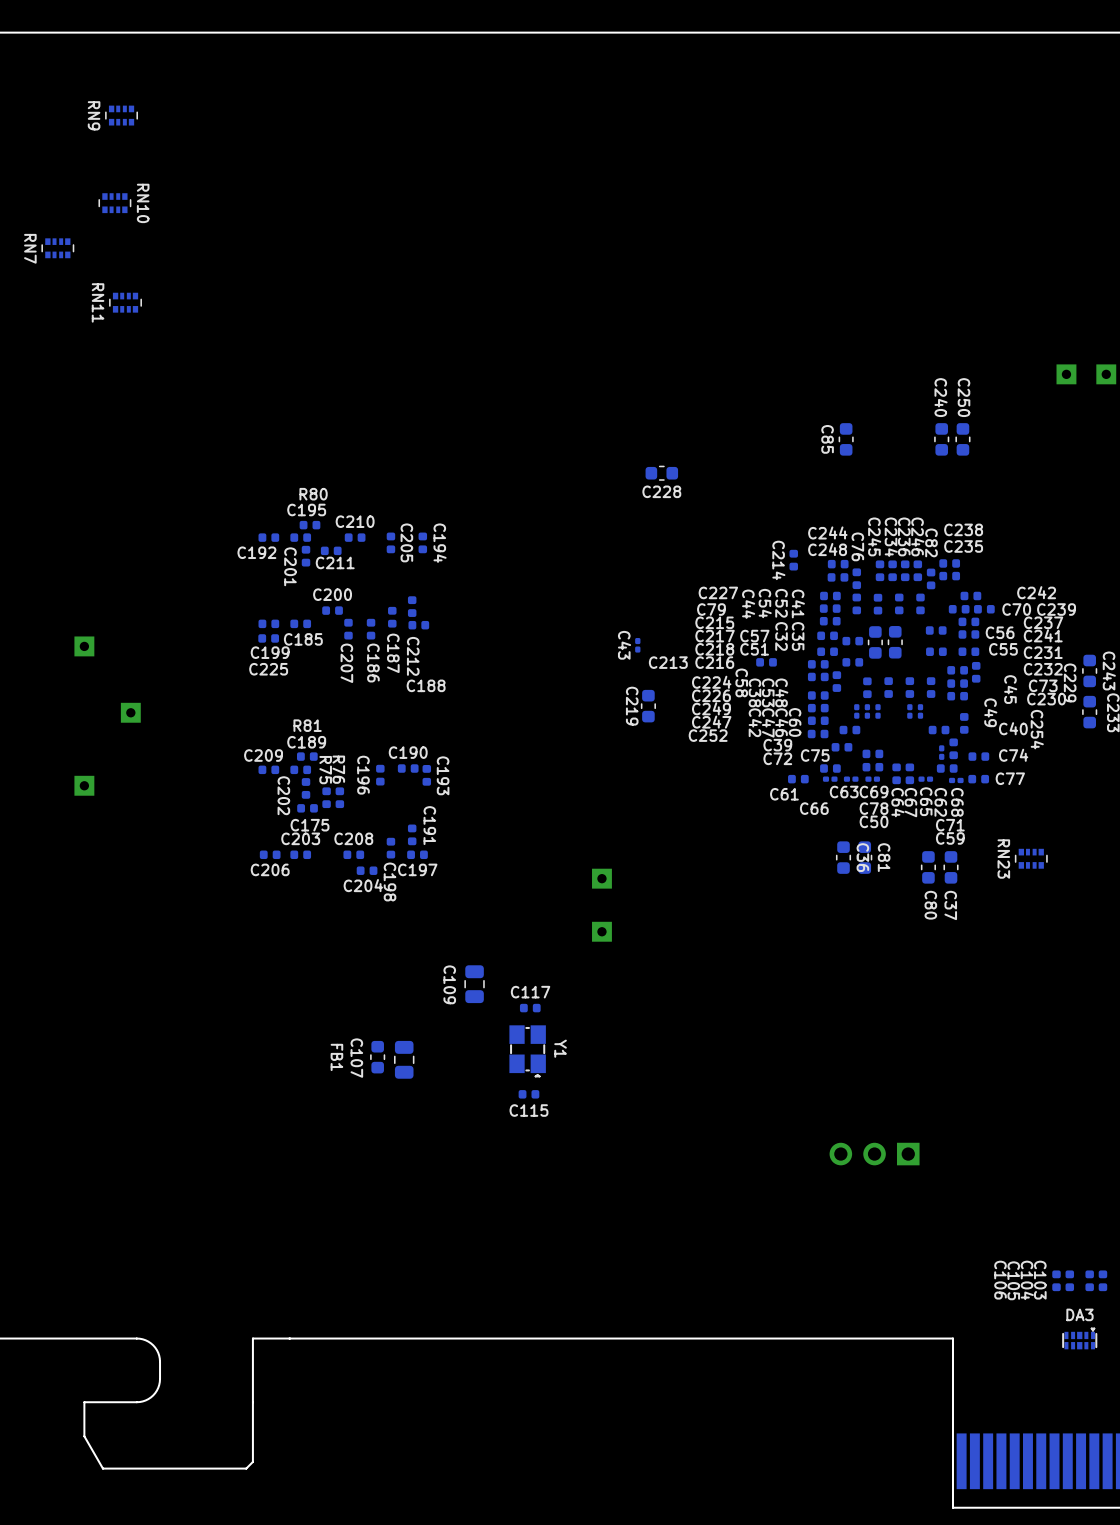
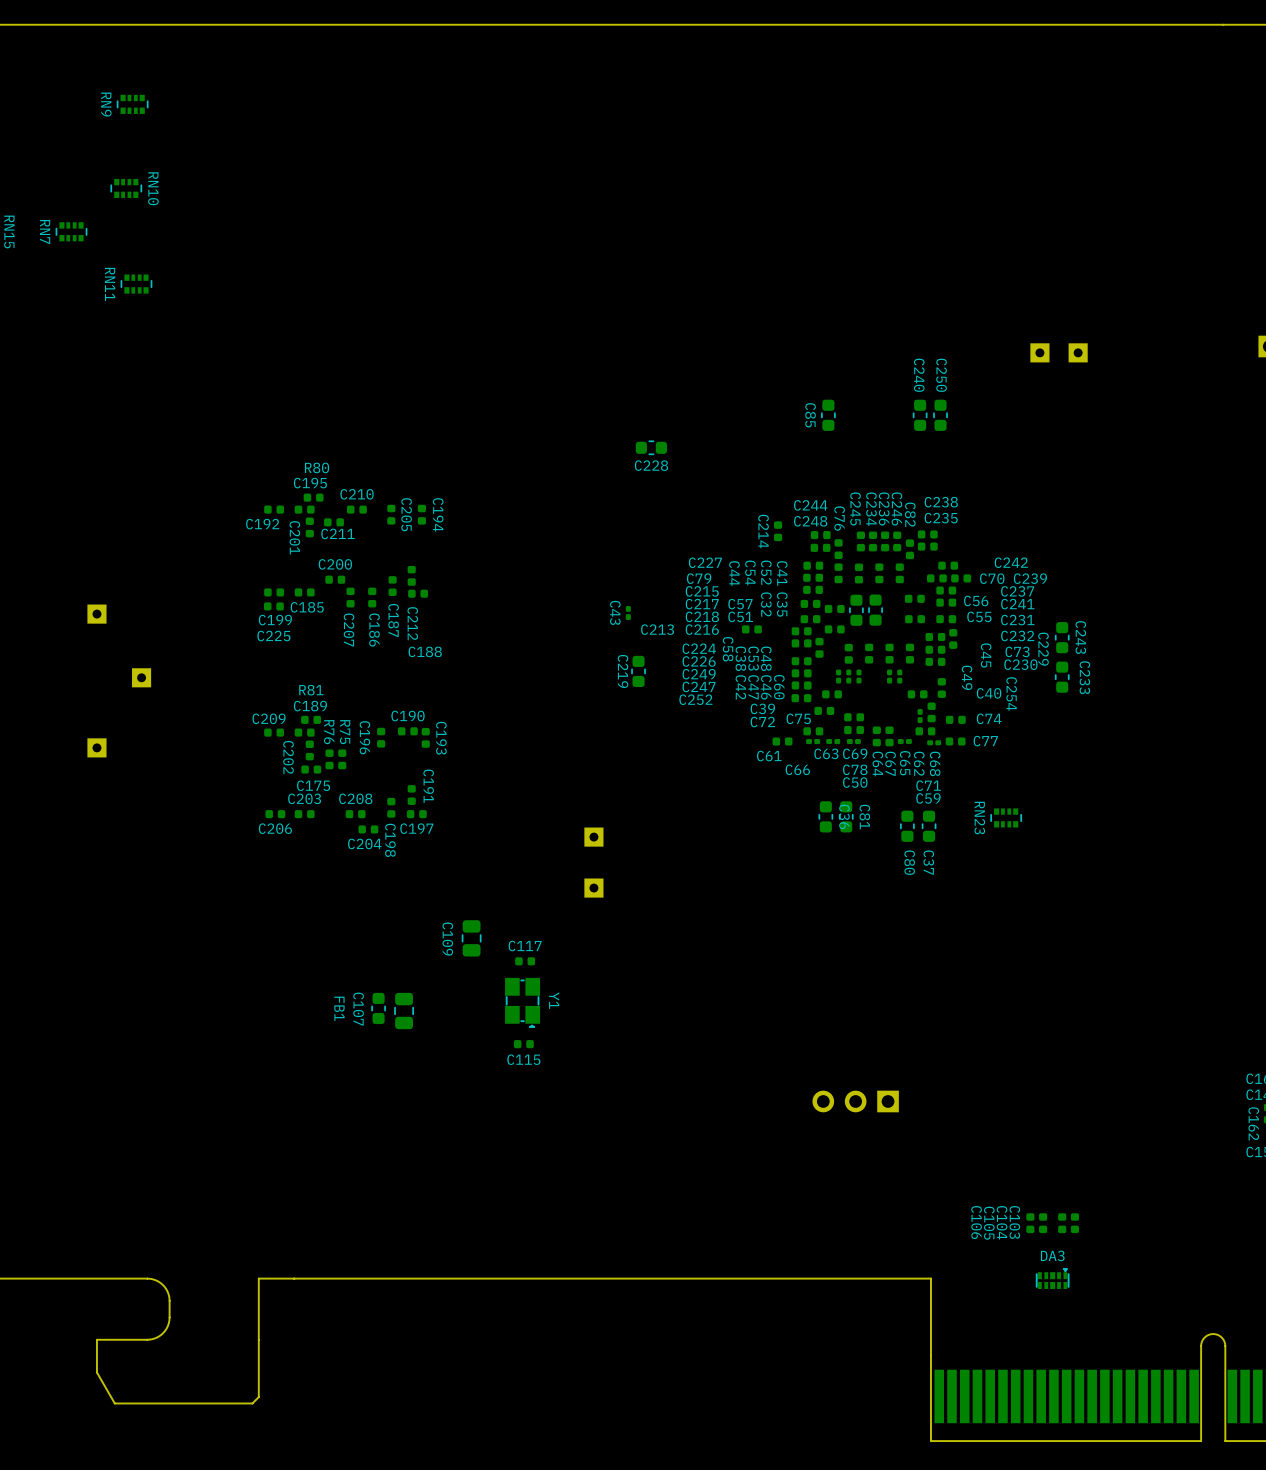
R76 name: R76 (338, 769) -> R75 (345, 732)
R75 name: R75 (325, 770) -> R76 (329, 732)

